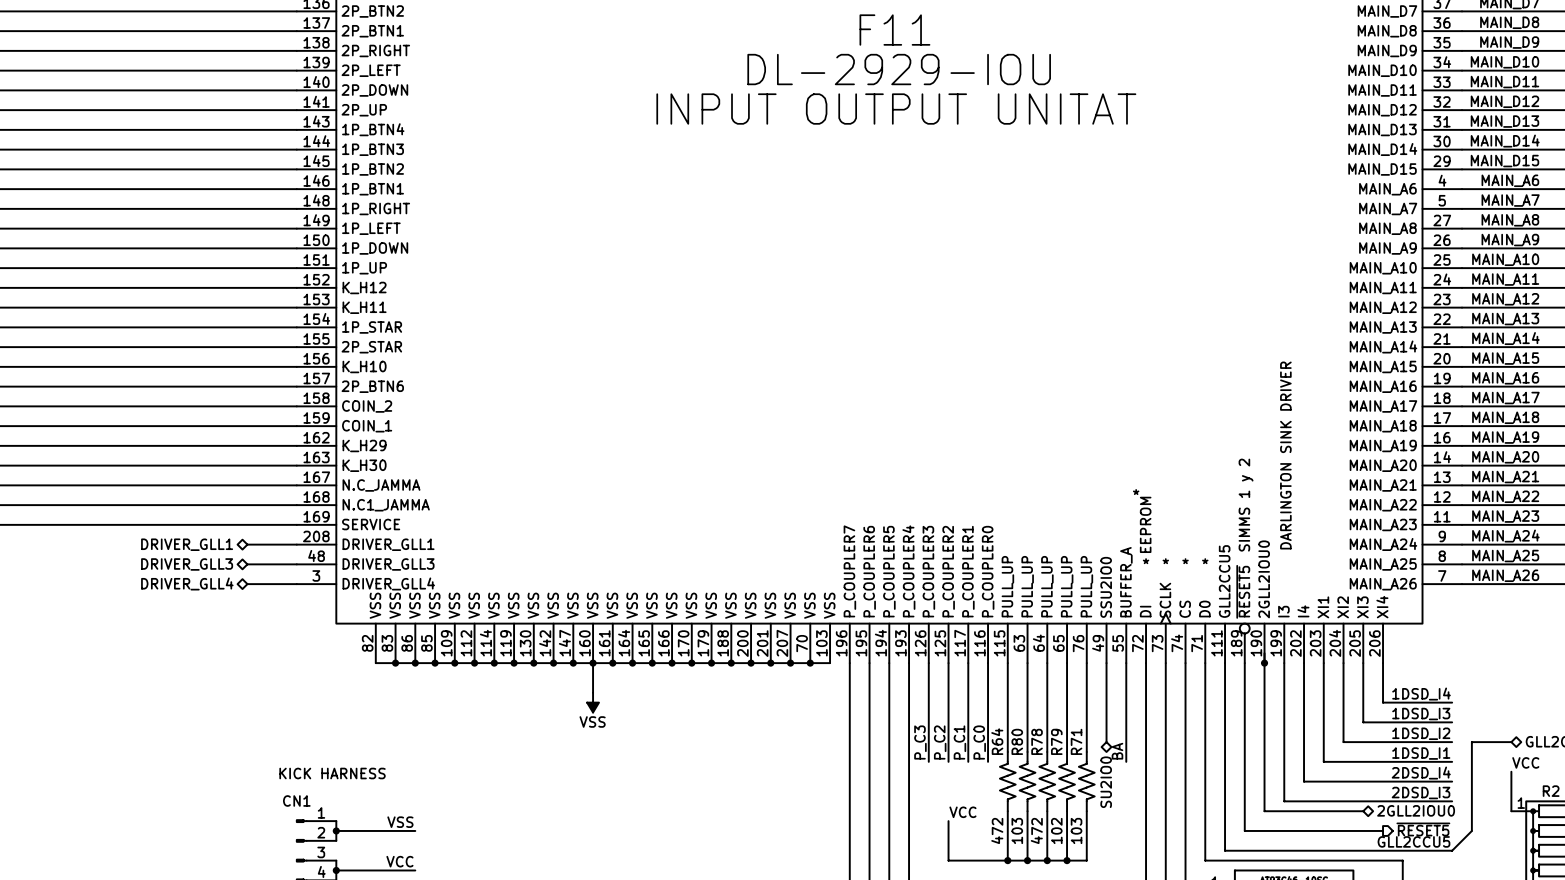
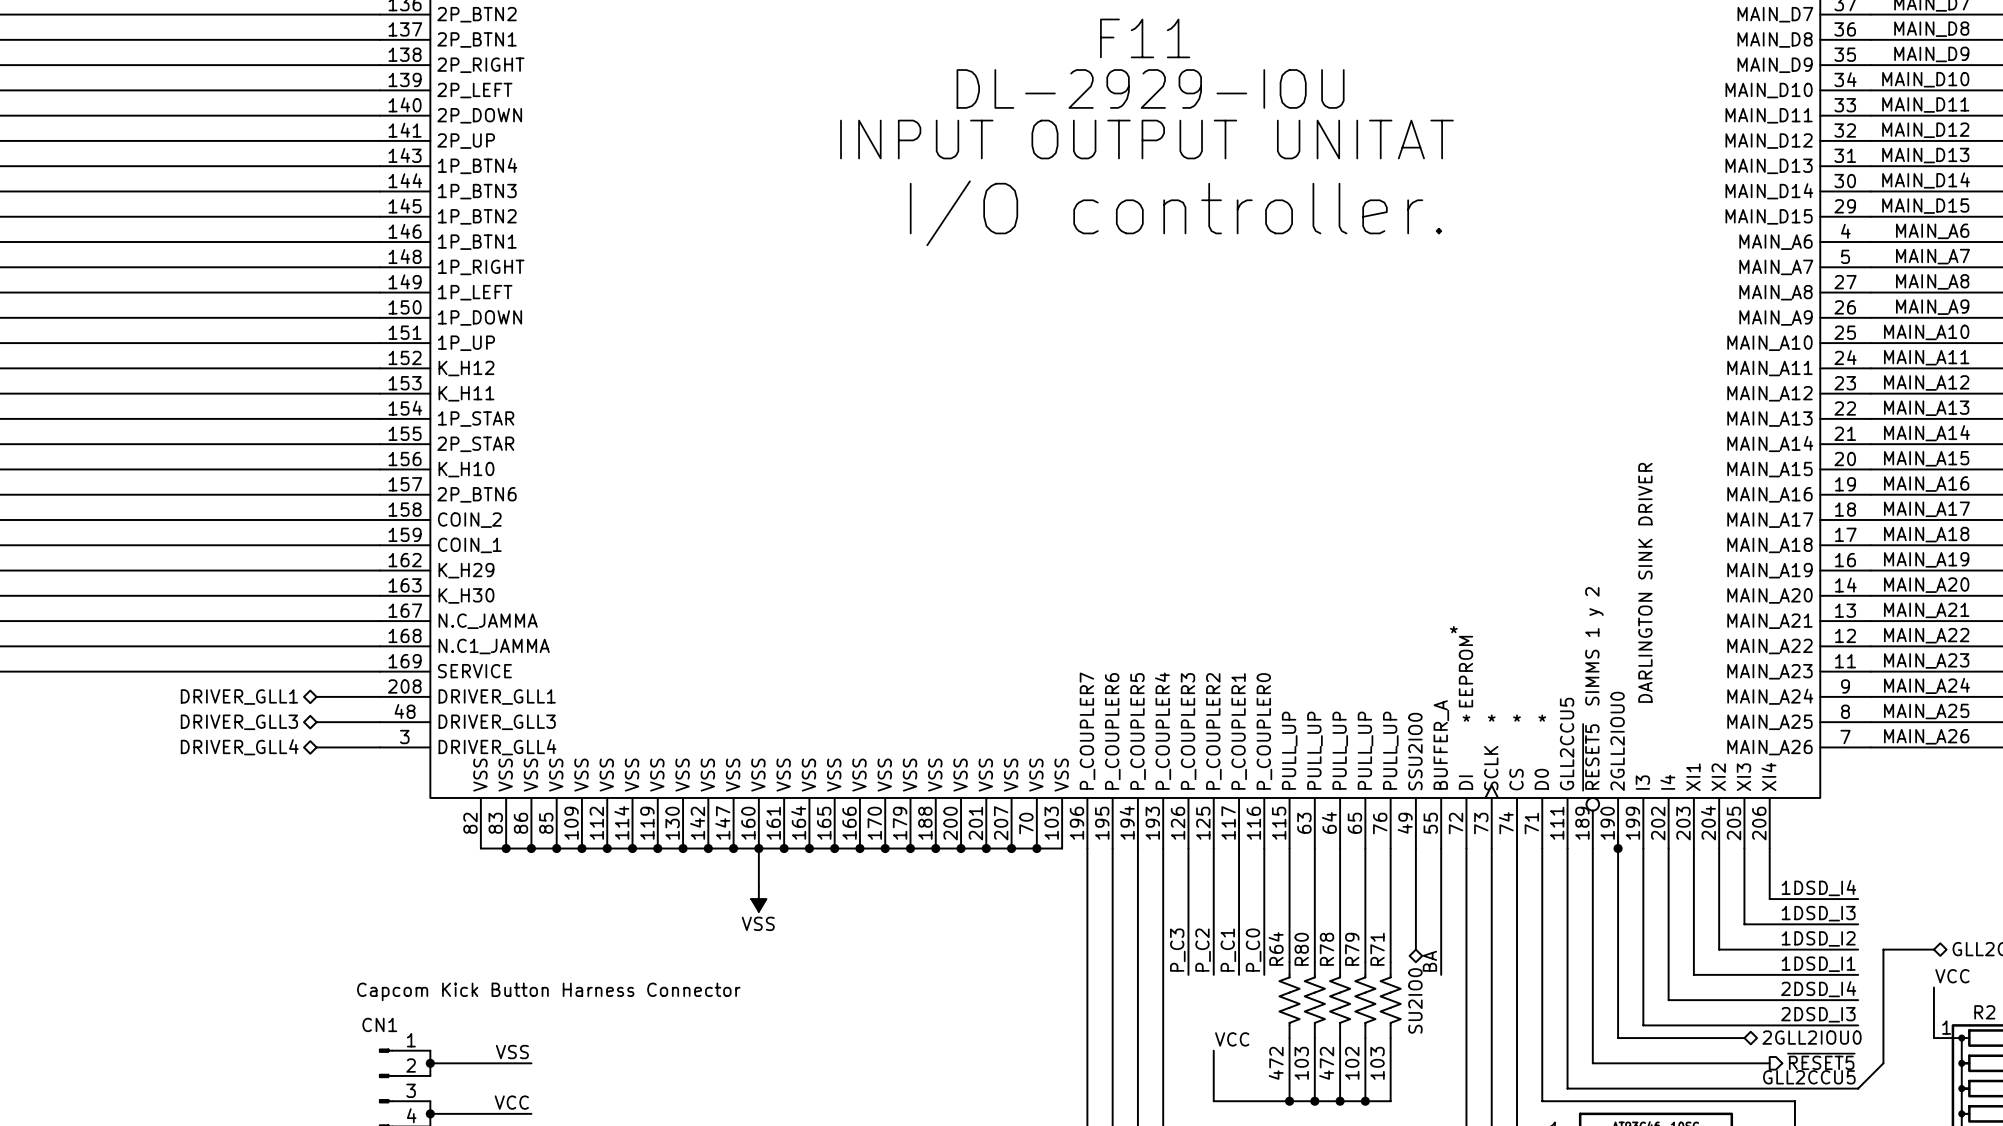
text: none -> I/O controller. (1176, 213)
text: KICK HARNESS (332, 773) -> Capcom Kick Button Harness Connector (548, 991)

